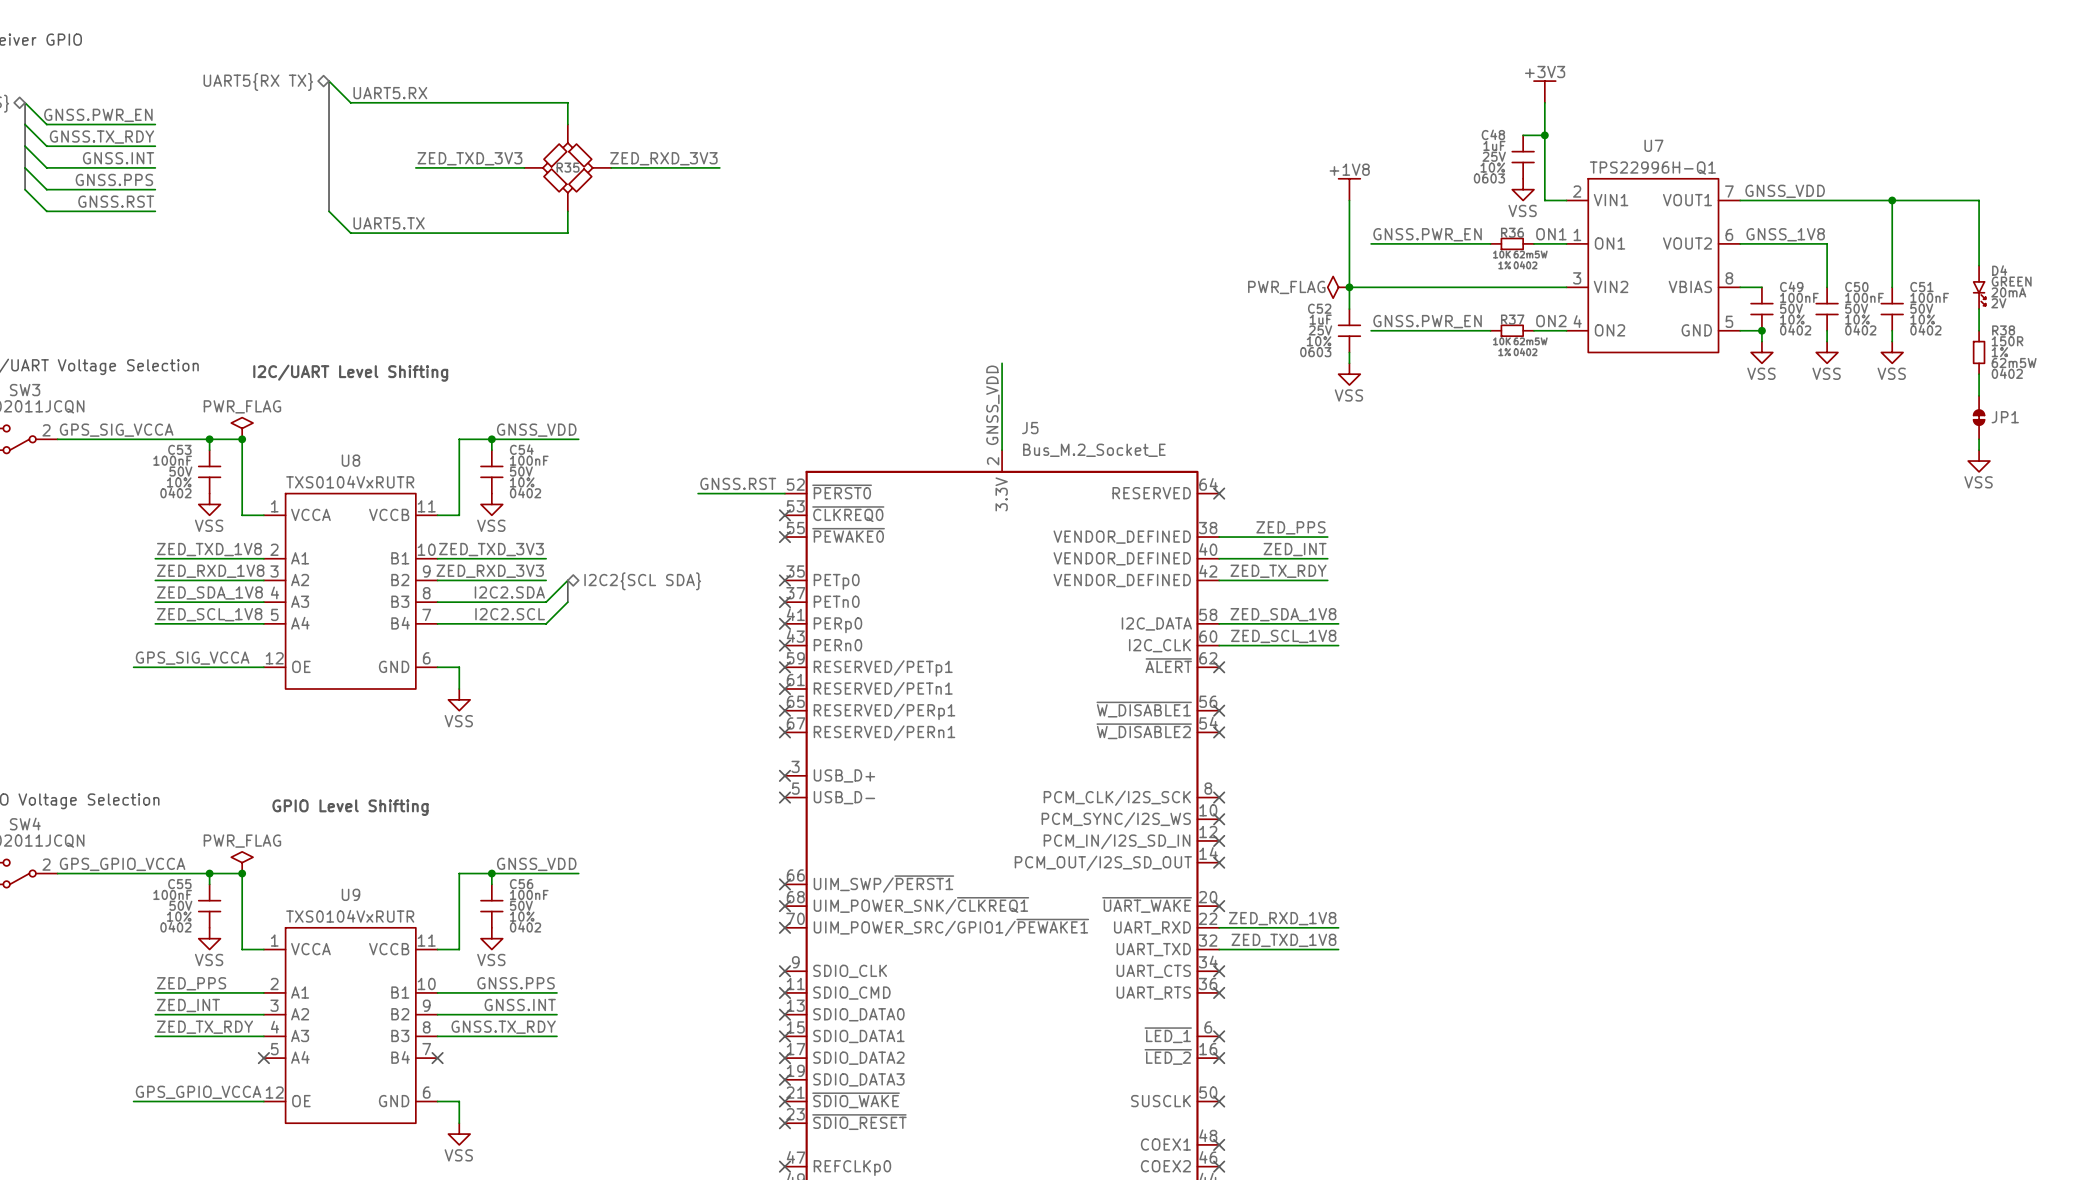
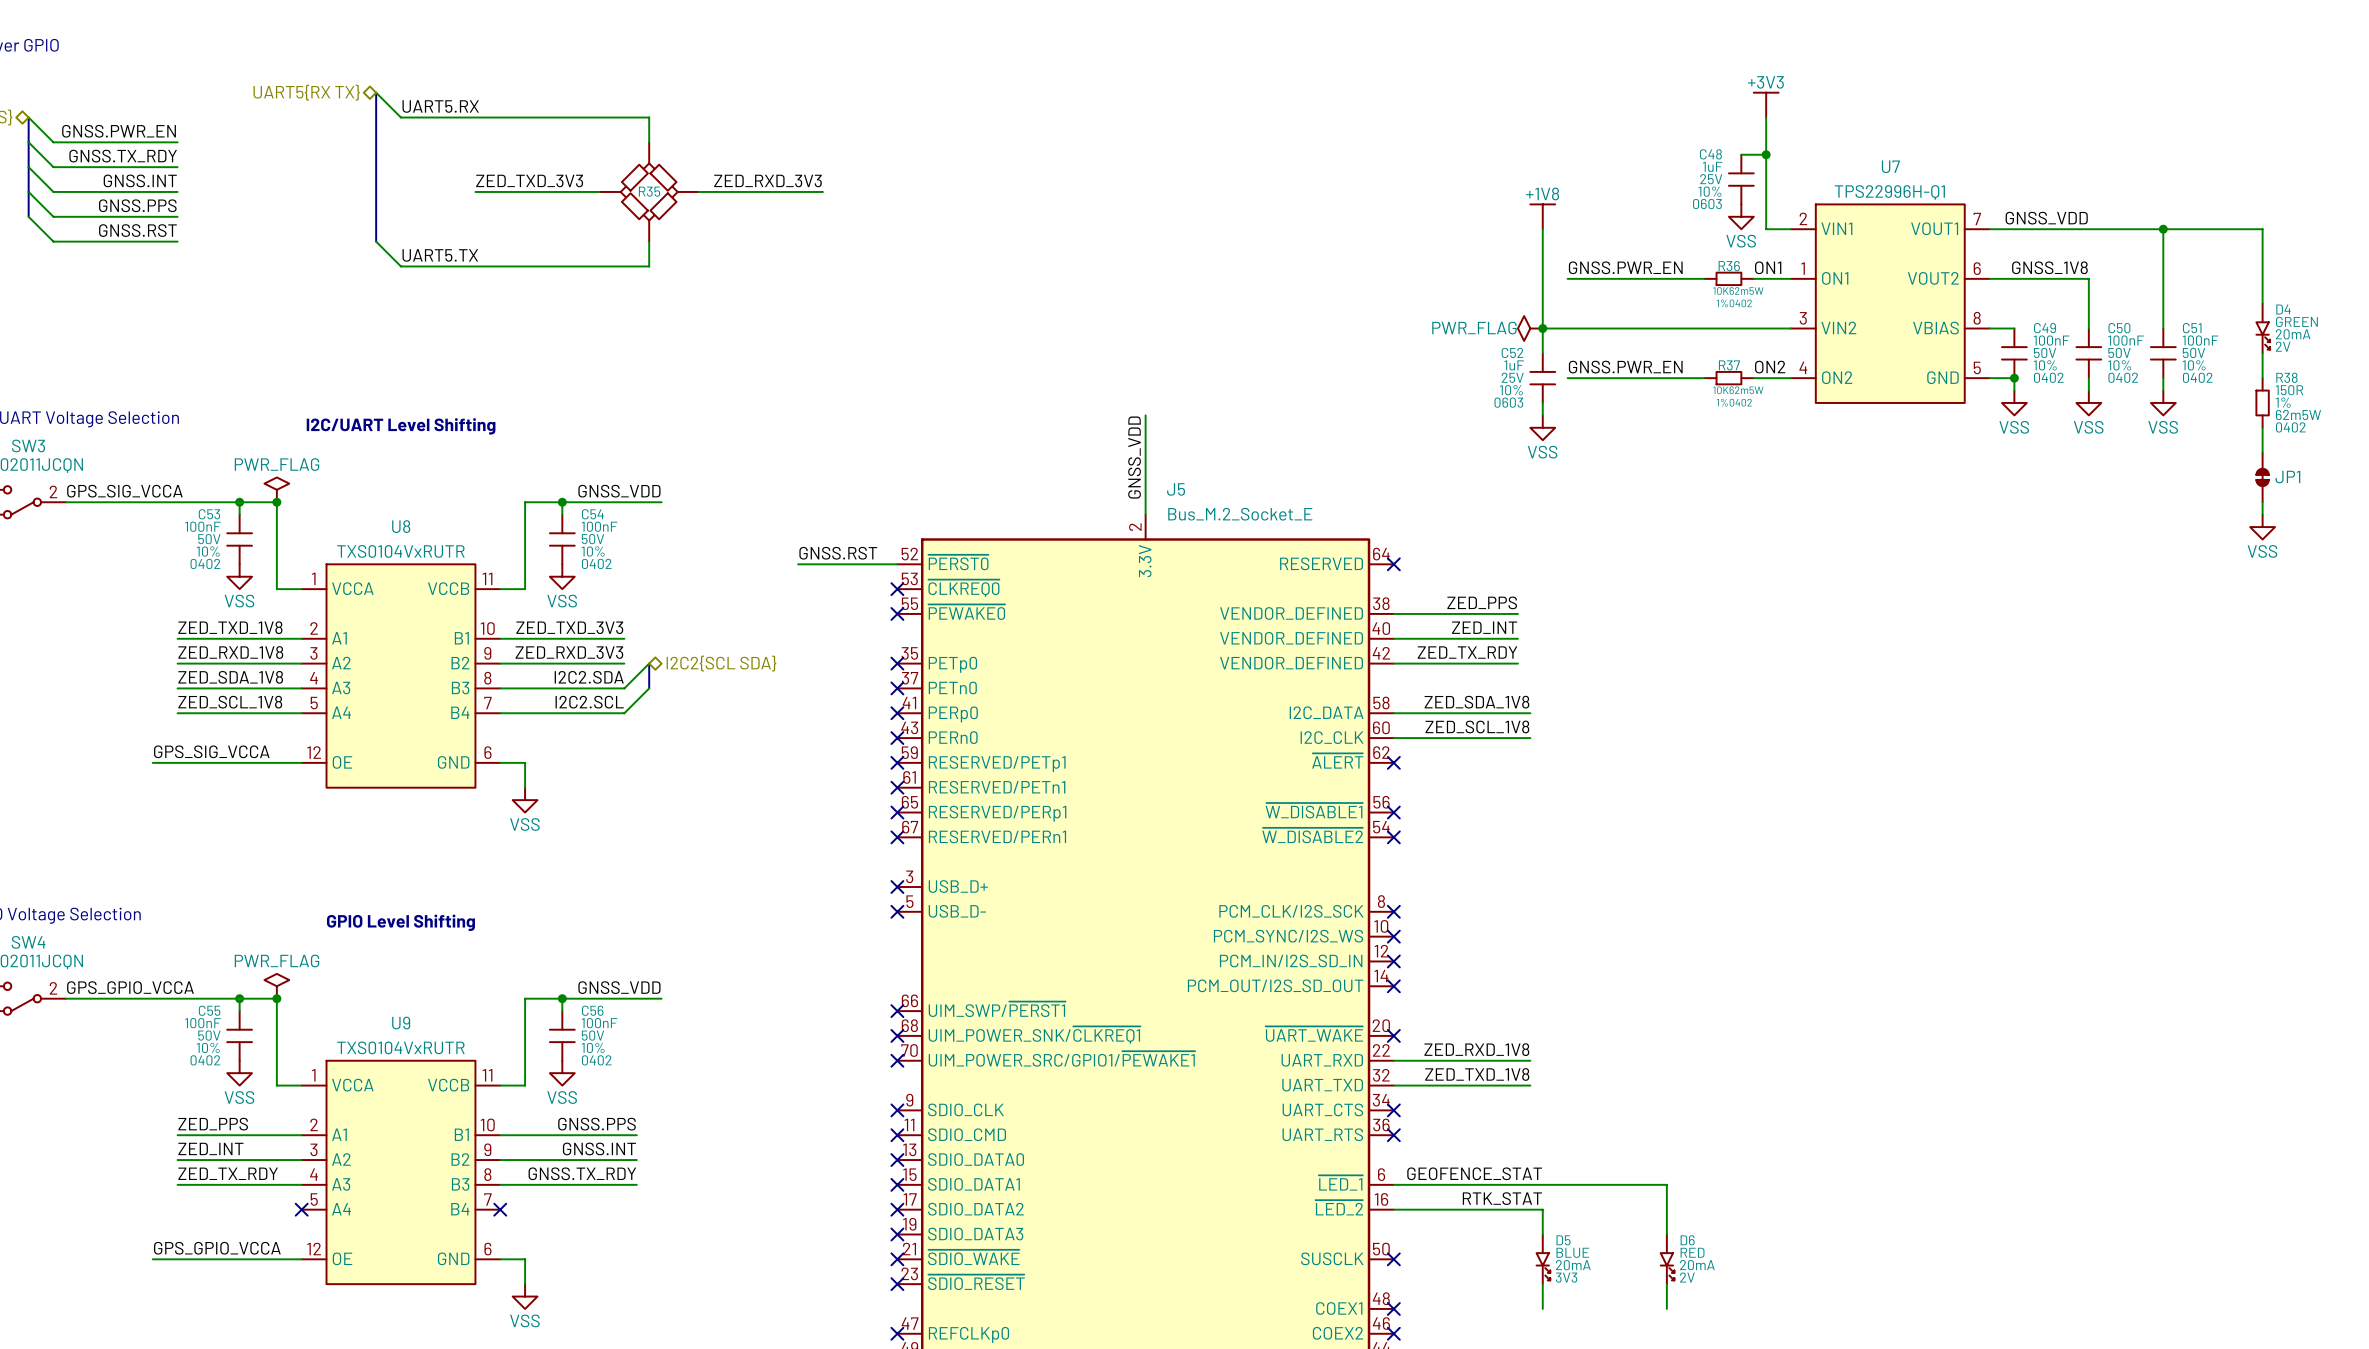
label: none -> GEOFENCE_STAT (1474, 1173)
wire: none -> (1393, 1184) (1666, 1184) (1666, 1234)
no-connect mark: (1219, 1036) -> none
label: none -> RTK_STAT (1502, 1198)
wire: none -> (1393, 1209) (1542, 1209) (1542, 1234)
no-connect mark: (1219, 1058) -> none
D5: none -> (1543, 1259)
D6: none -> (1667, 1259)
wire: none -> (1542, 1284) (1542, 1308)
wire: none -> (1666, 1284) (1666, 1308)

